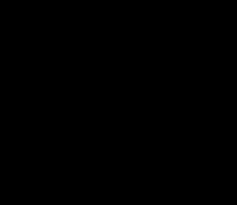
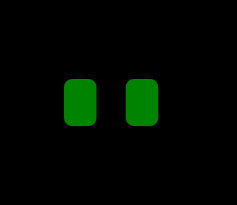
part: none -> (111, 102)

